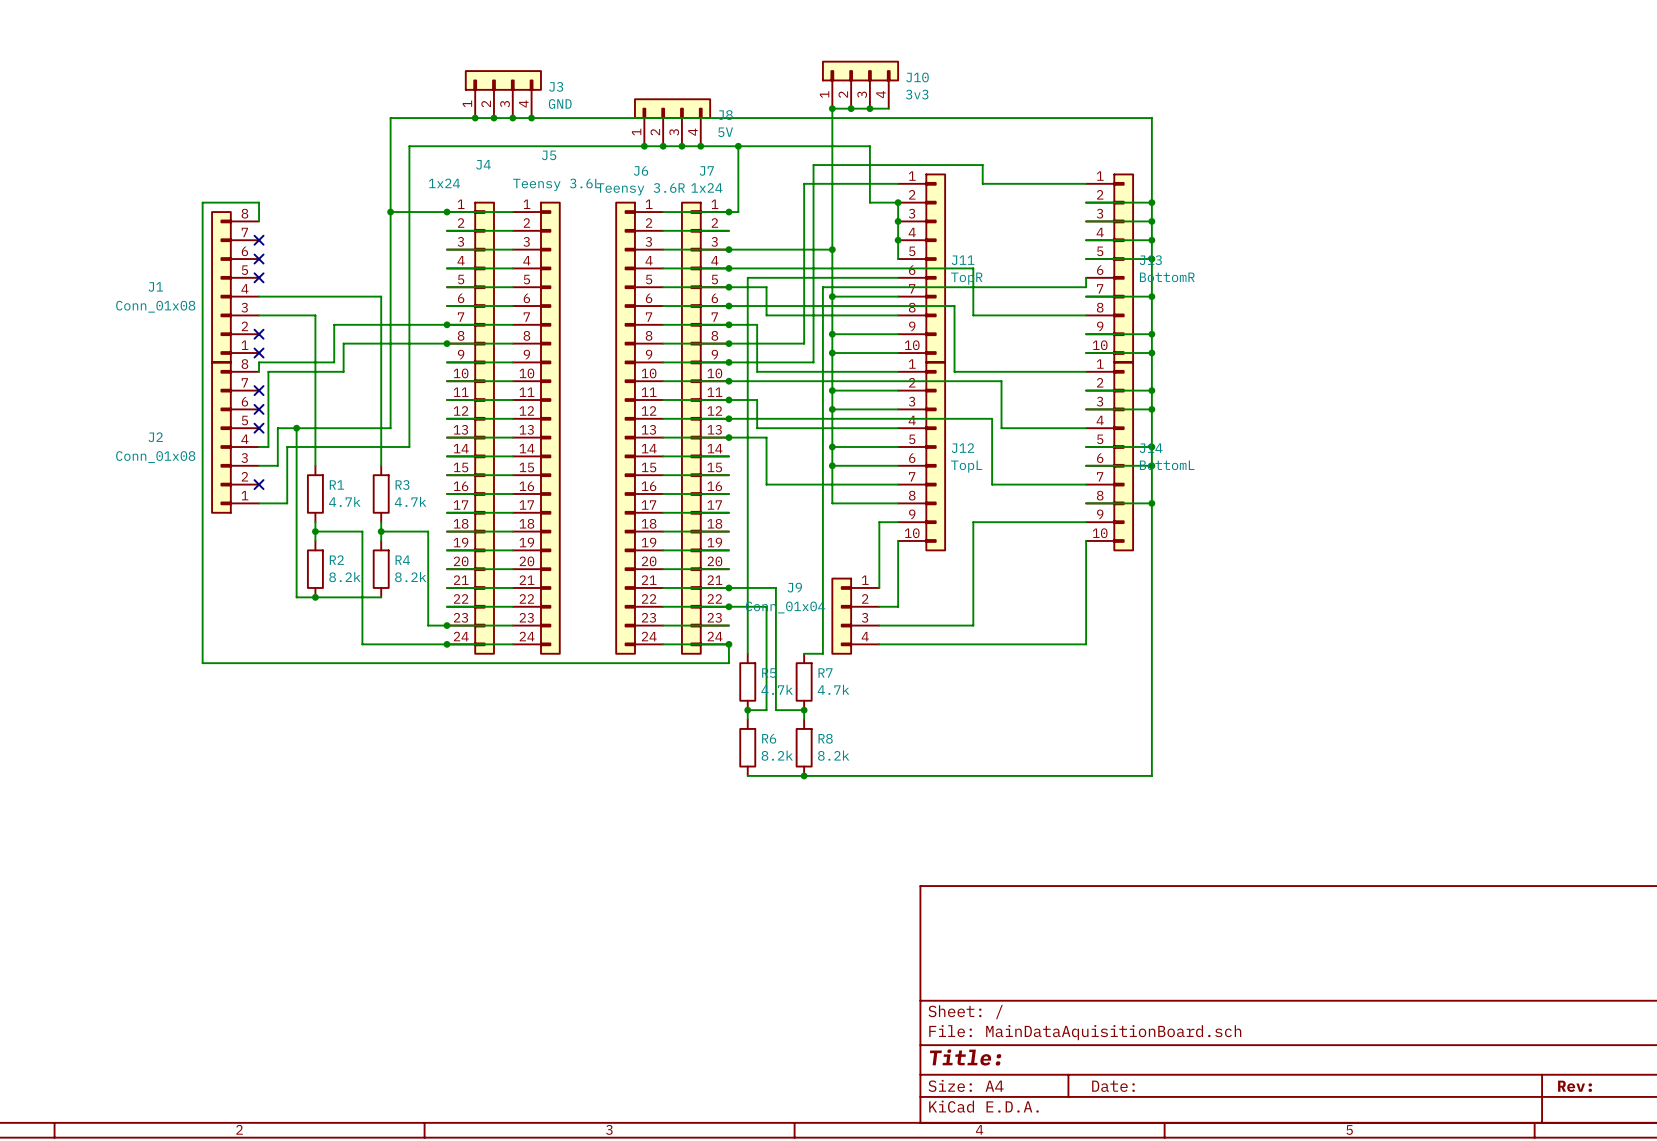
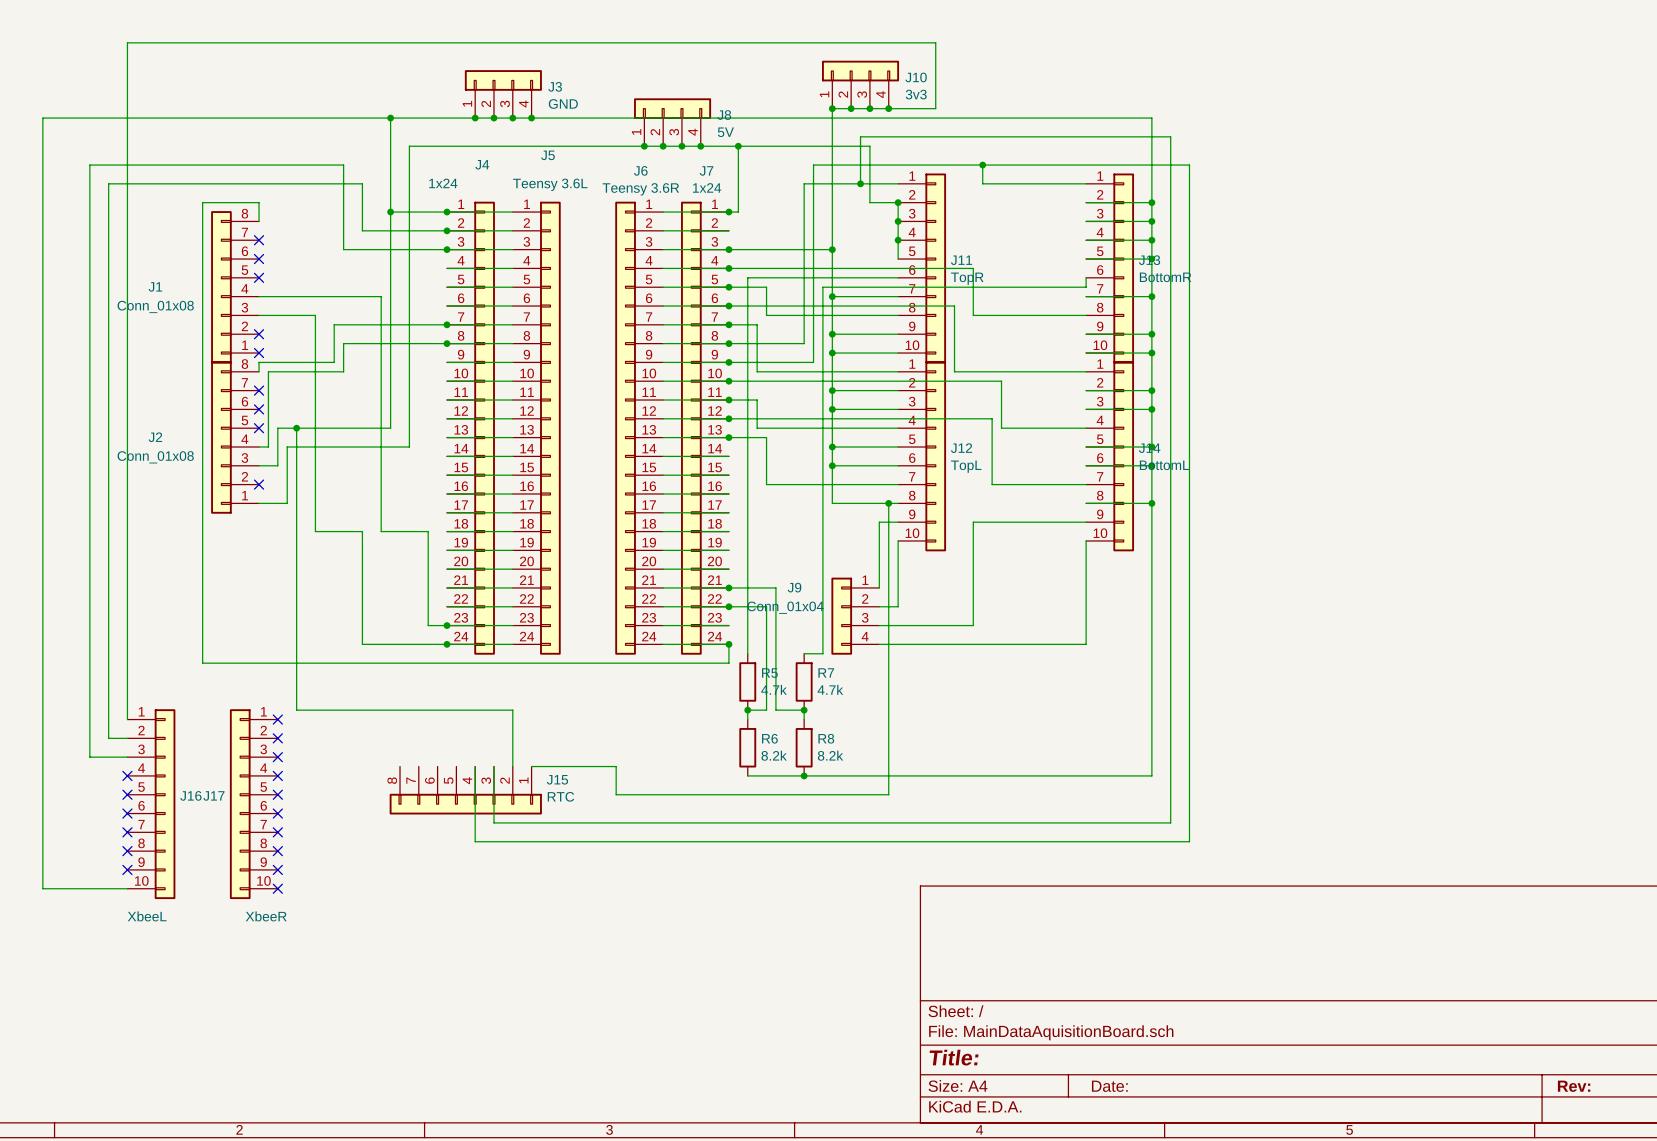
wire: none -> (888, 108) (935, 108) (935, 42) (127, 42) (127, 719)
junction: none -> (888, 108)
wire: none -> (390, 118) (42, 118) (42, 888) (127, 888)
junction: none -> (390, 118)
wire: none -> (982, 165) (1189, 165) (1189, 841) (475, 841) (475, 766)
junction: none -> (982, 165)
wire: none -> (860, 183) (860, 136) (1170, 136) (1170, 822) (493, 822) (493, 766)
junction: none -> (860, 183)
wire: none -> (447, 230) (362, 230) (362, 183) (108, 183) (108, 738) (127, 738)
junction: none -> (447, 230)
wire: none -> (447, 249) (343, 249) (343, 165) (89, 165) (89, 757) (127, 757)
junction: none -> (447, 249)
wire: none -> (315, 465) (315, 522)
wire: none -> (381, 465) (381, 522)
R1: 4.7k (315, 493) -> none
R3: 4.7k (381, 493) -> none
wire: none -> (888, 503) (888, 794) (616, 794) (616, 766) (531, 766)
junction: none -> (888, 503)
wire: (315, 531) (315, 540) -> none
junction: (315, 531) -> none
wire: (381, 531) (381, 540) -> none
junction: (381, 531) -> none
R2: 8.2k (315, 569) -> none
R4: 8.2k (381, 569) -> none
wire: (296, 597) (381, 597) -> (296, 597) (296, 710) (512, 710) (512, 766)
junction: (315, 597) -> none
no-connect mark: none -> (277, 719)
no-connect mark: none -> (277, 738)
no-connect mark: none -> (277, 757)
no-connect mark: none -> (127, 775)
no-connect mark: none -> (277, 775)
J15: none -> RTC (465, 790)
no-connect mark: none -> (127, 794)
no-connect mark: none -> (277, 794)
J16: none -> XbeeL (151, 804)
J17: none -> XbeeR (253, 804)
no-connect mark: none -> (127, 813)
no-connect mark: none -> (277, 813)
no-connect mark: none -> (127, 832)
no-connect mark: none -> (277, 832)
no-connect mark: none -> (127, 851)
no-connect mark: none -> (277, 851)
no-connect mark: none -> (127, 869)
no-connect mark: none -> (277, 869)
no-connect mark: none -> (277, 888)

